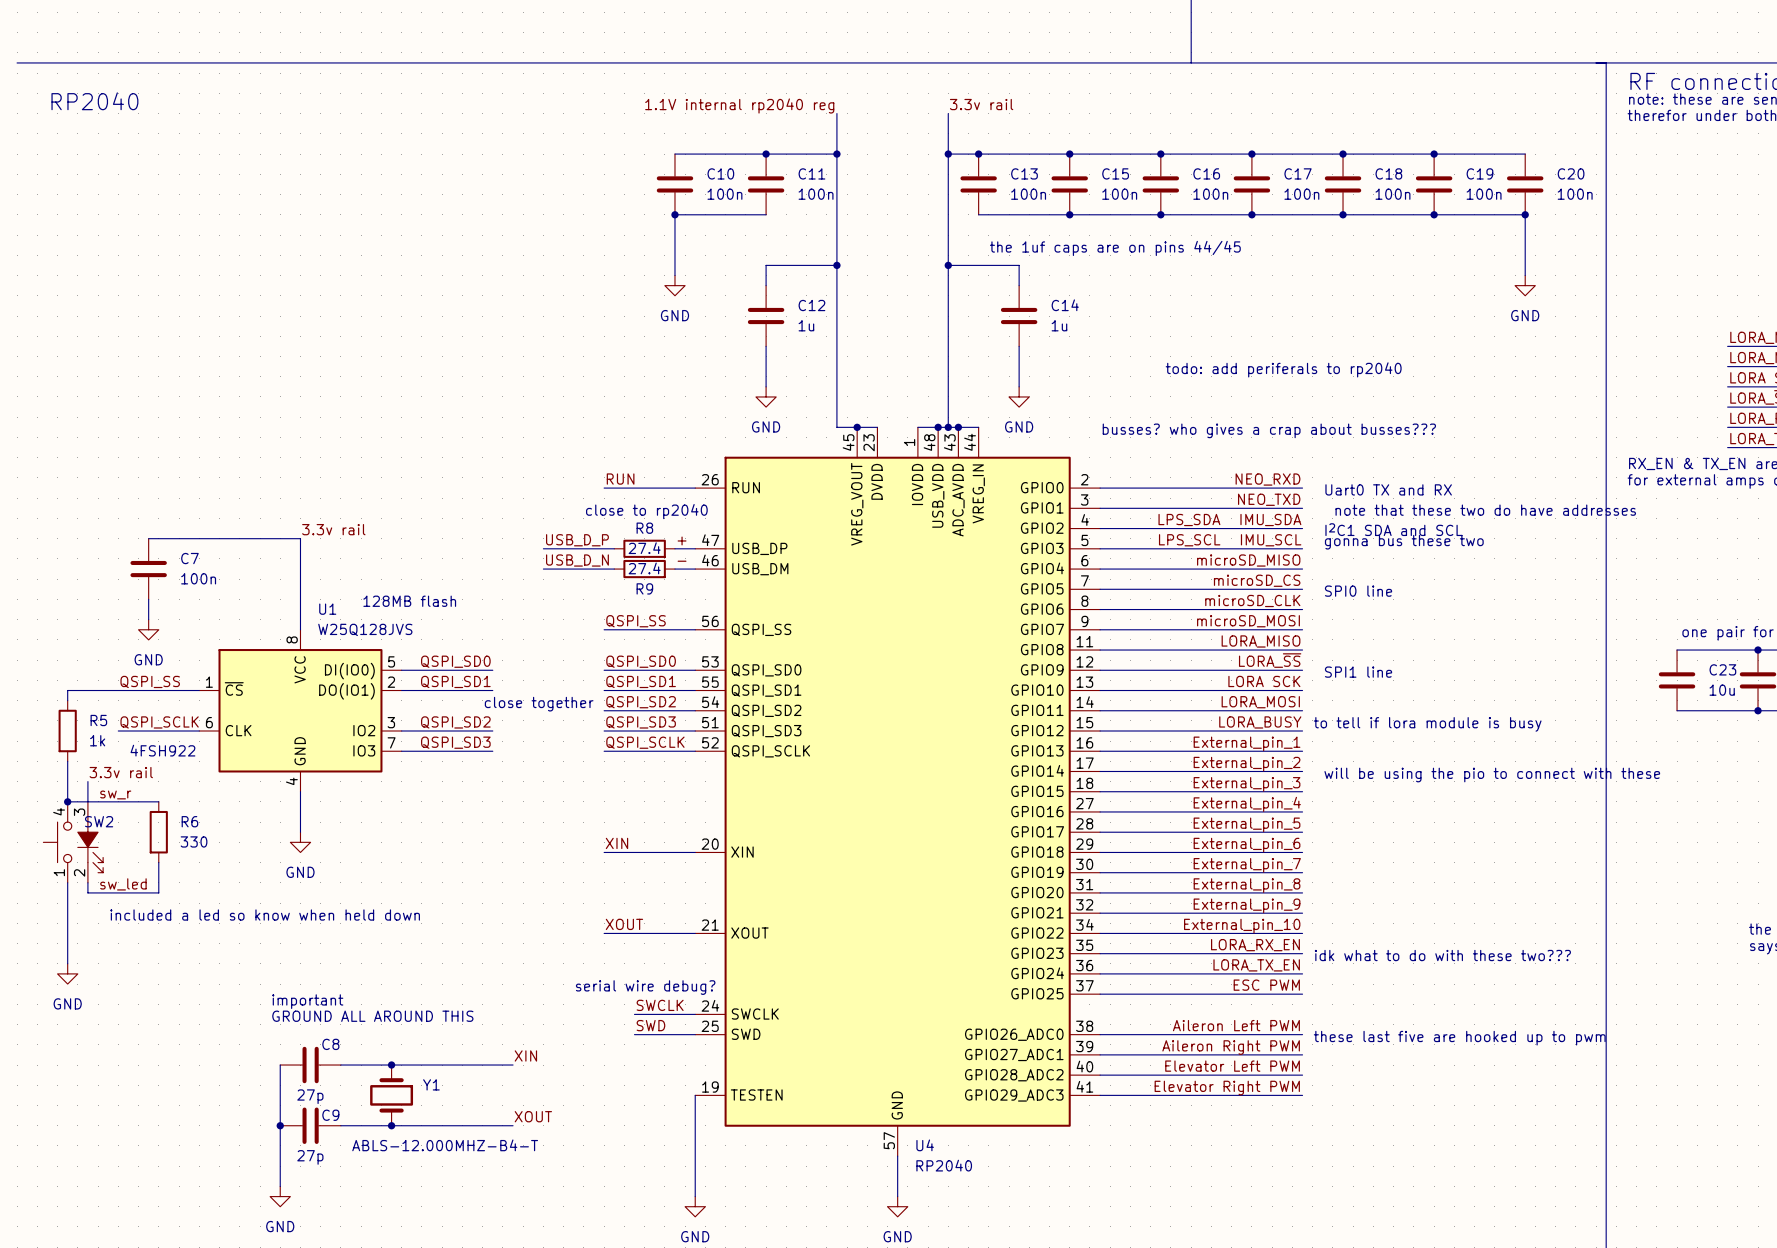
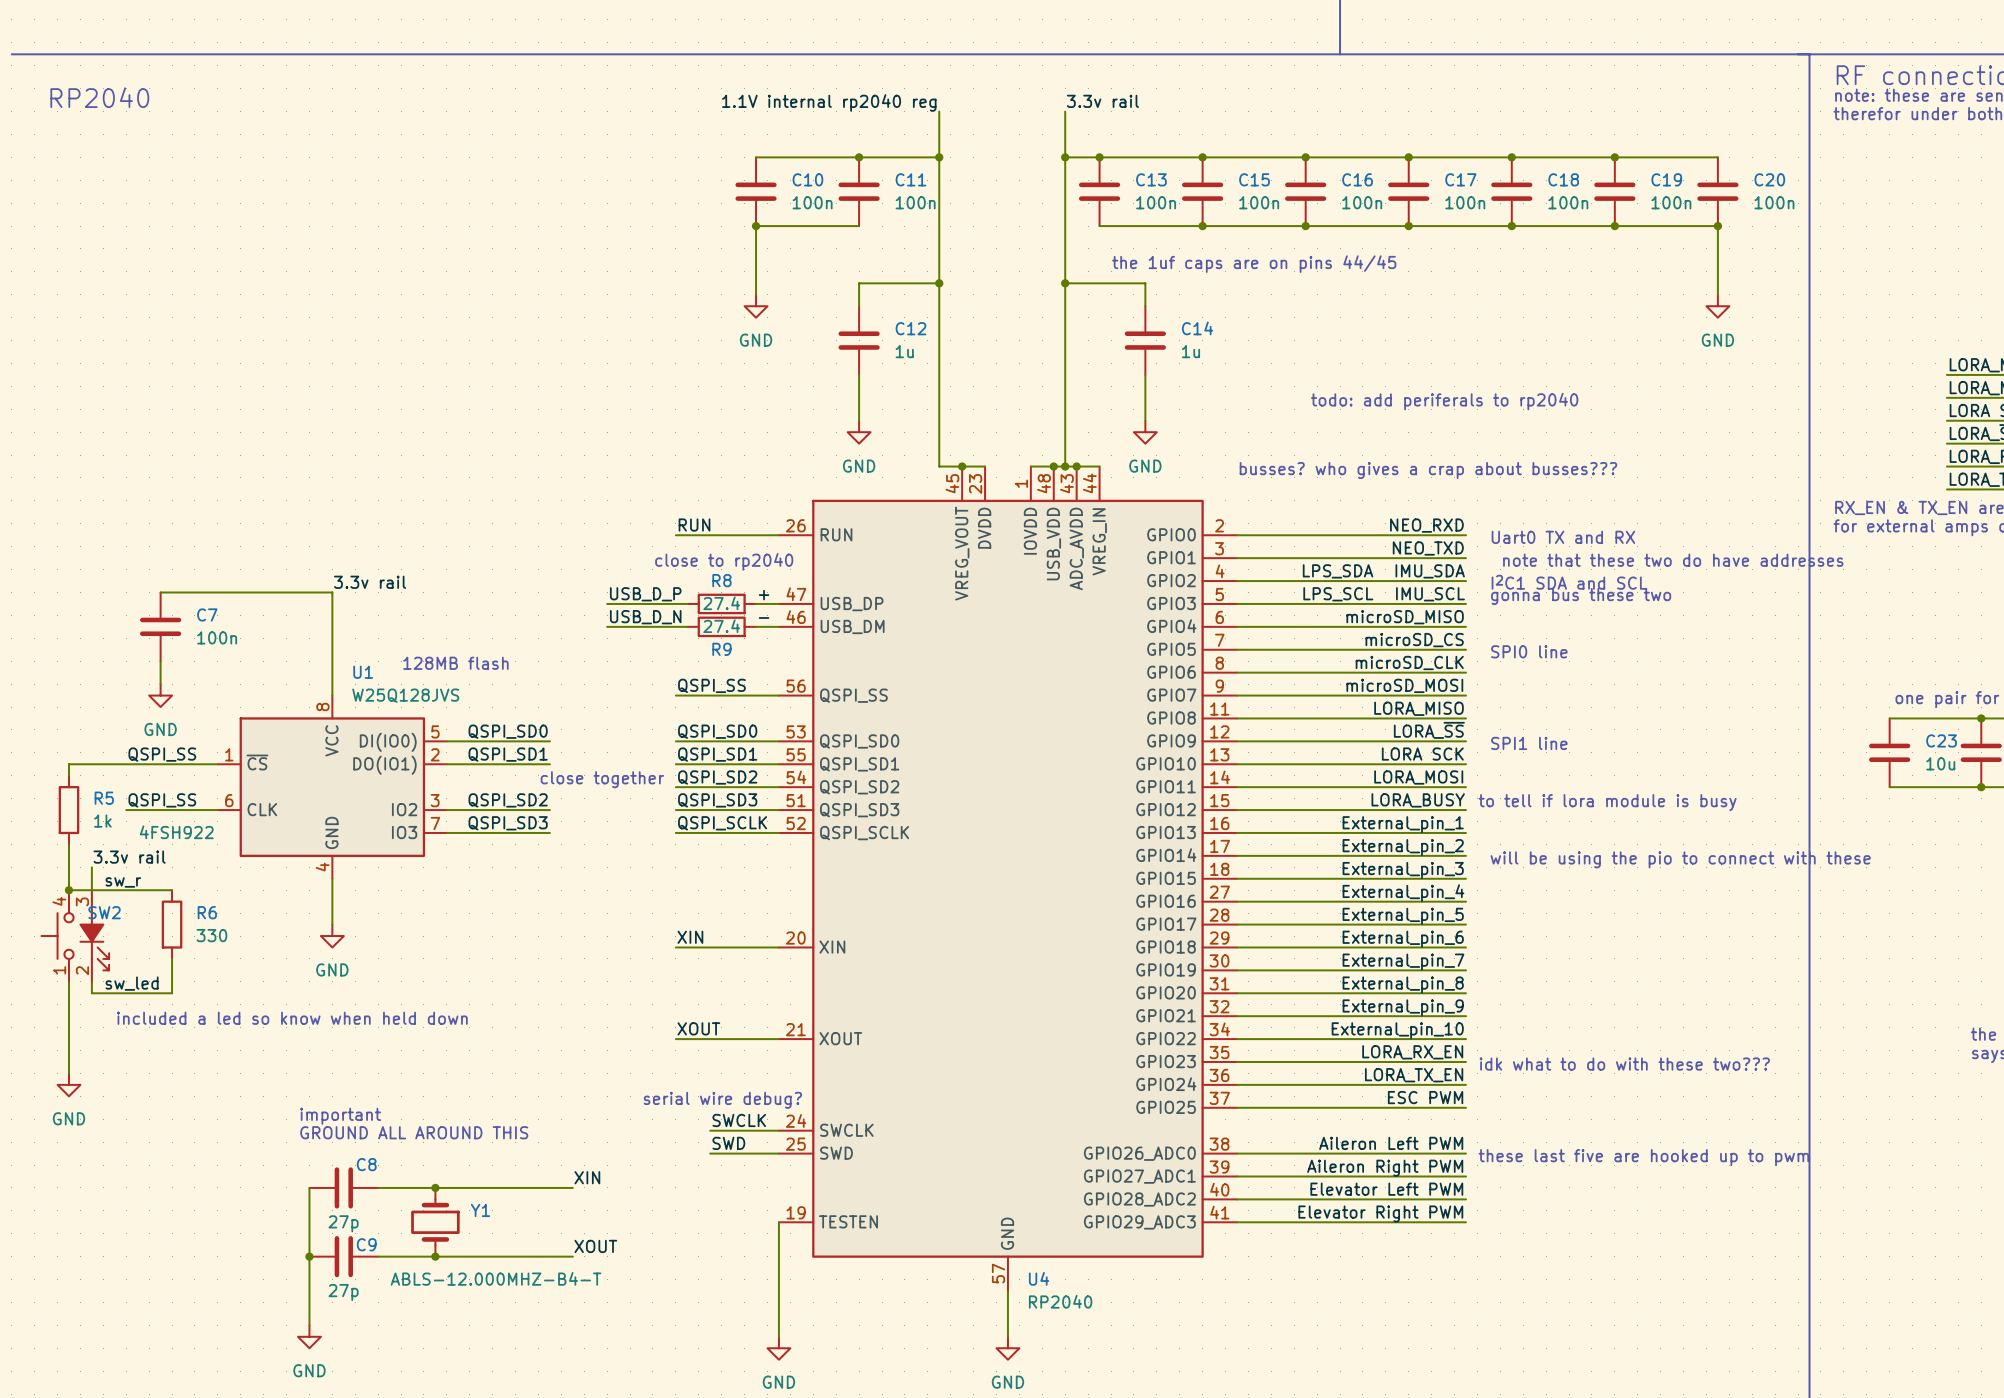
label: QSPI_SCLK (159, 722) -> QSPI_SS (162, 800)

